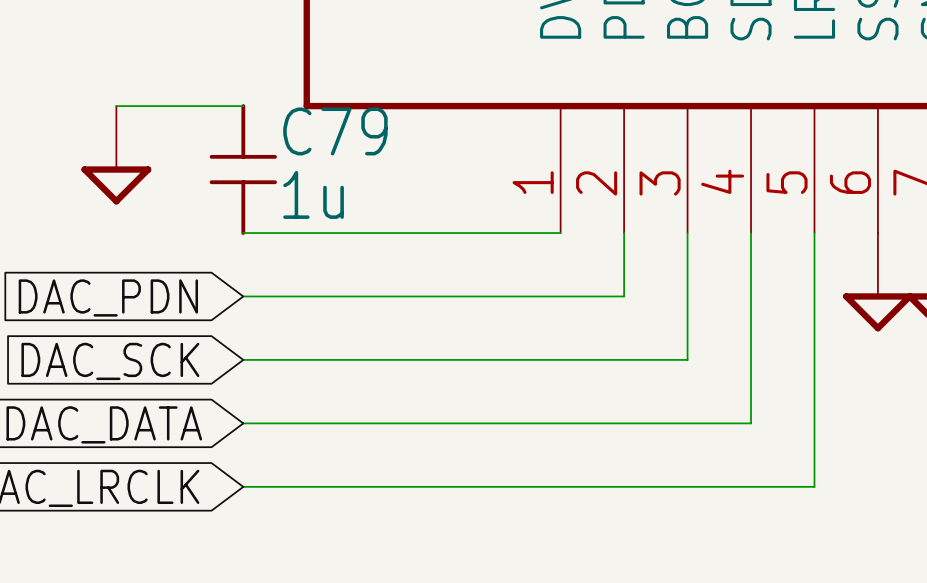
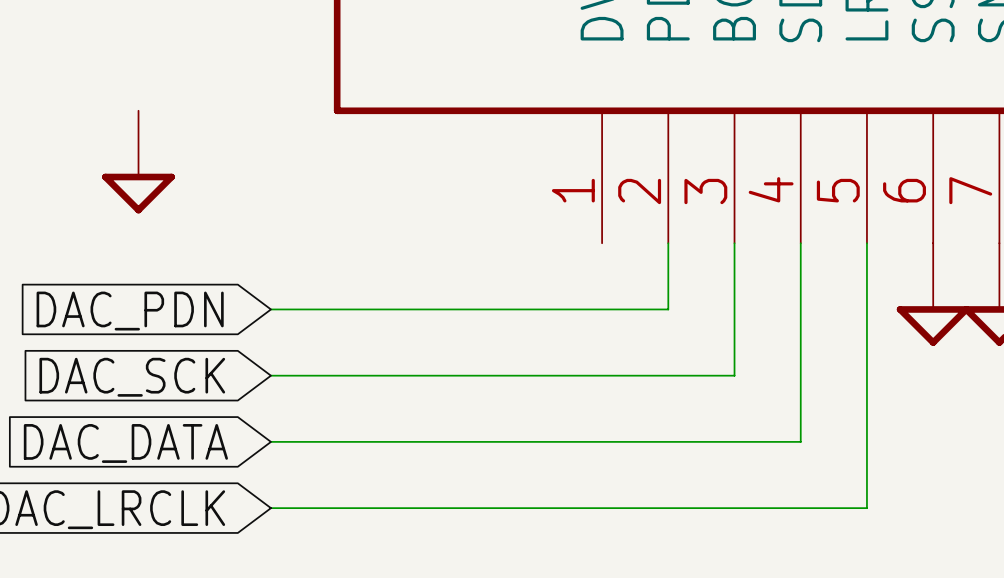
wire: (116, 106) (243, 106) -> none
C79: 1u (243, 169) -> none
wire: (243, 233) (560, 233) -> none

